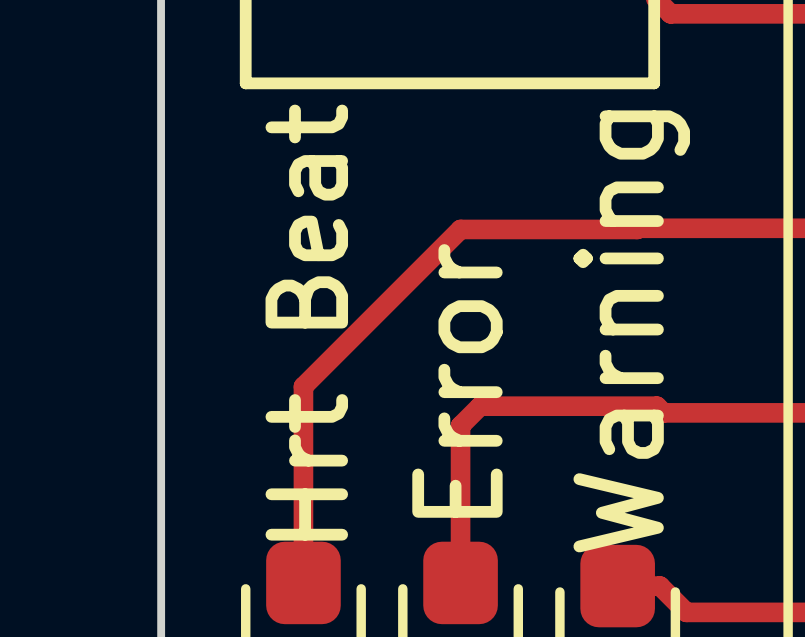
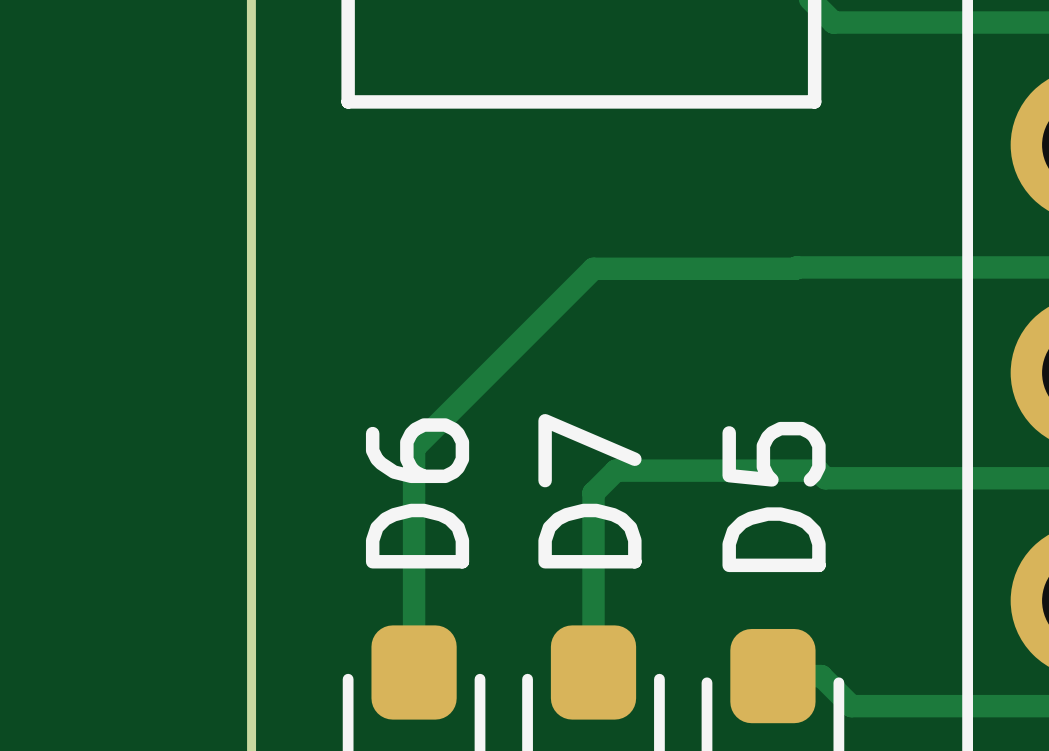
Hrt Beat name: Hrt Beat (306, 322) -> D6 (417, 493)
Warning name: Warning (631, 331) -> D5 (774, 496)
Error name: Error (457, 380) -> D7 (589, 491)

